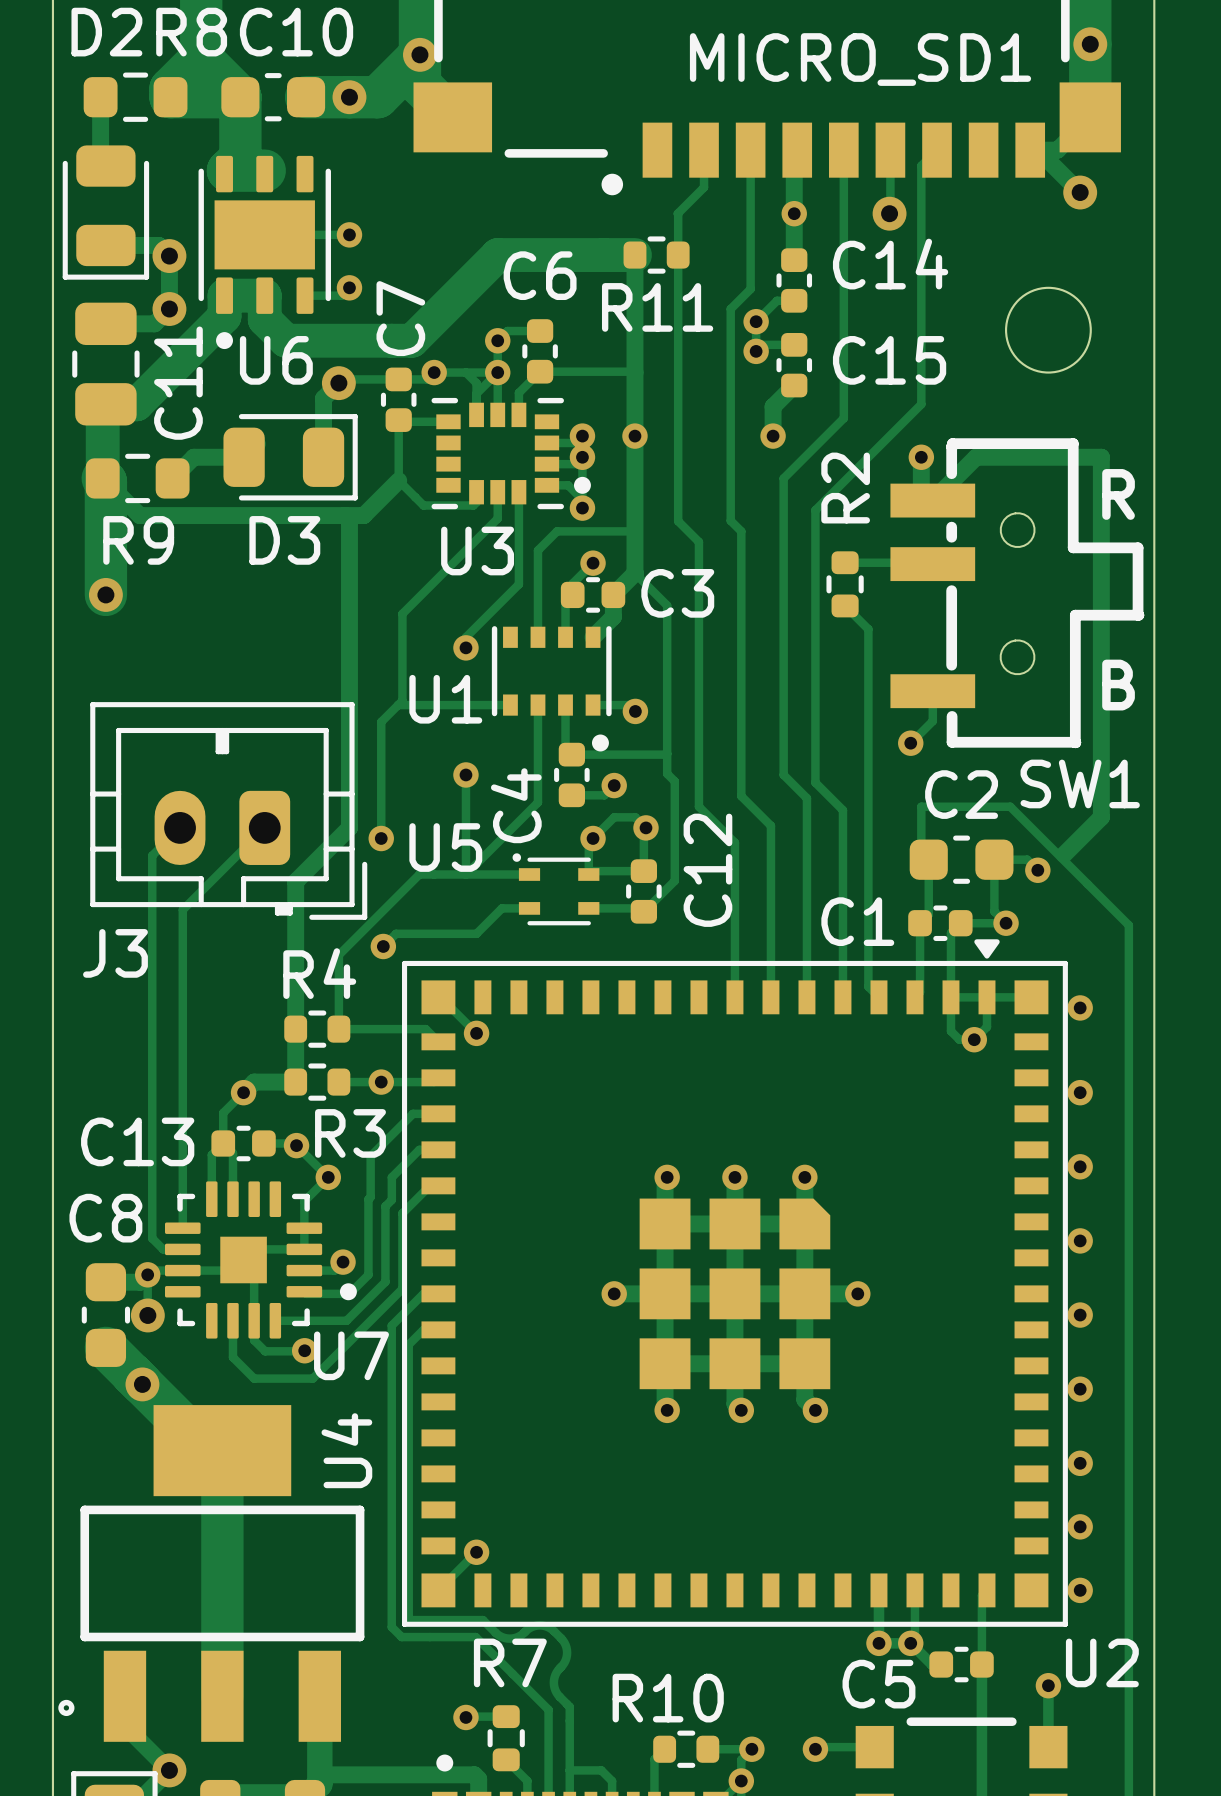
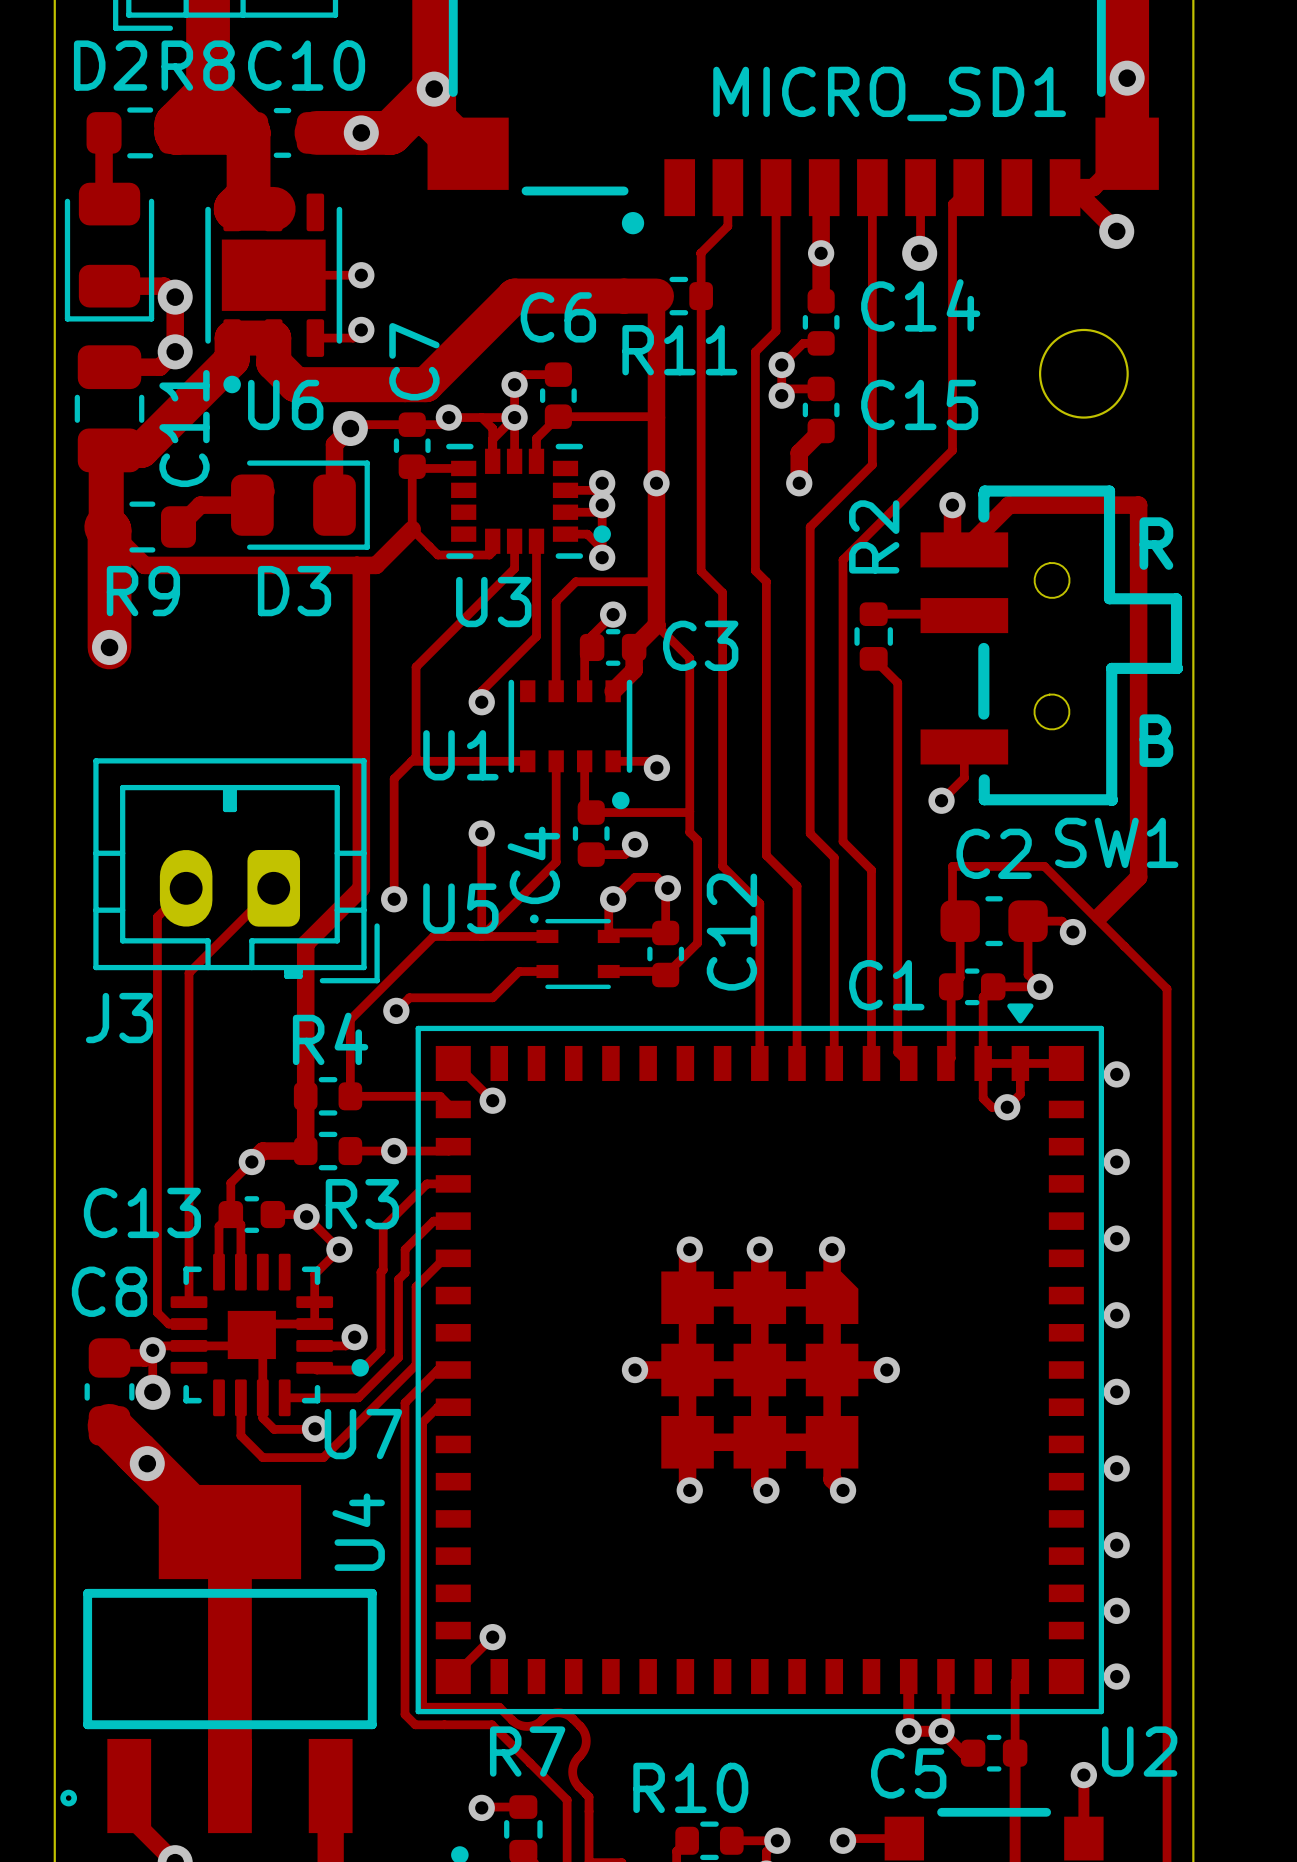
SW1 footprint: [890, 438, 1145, 749] -> [920, 485, 1183, 806]

